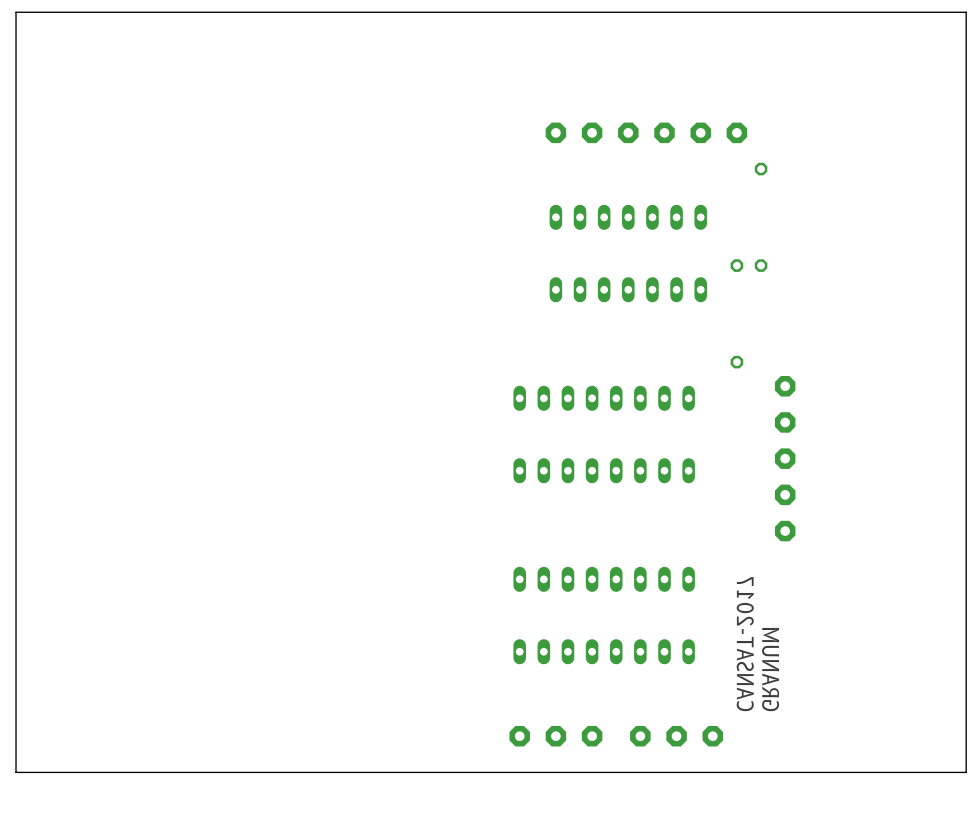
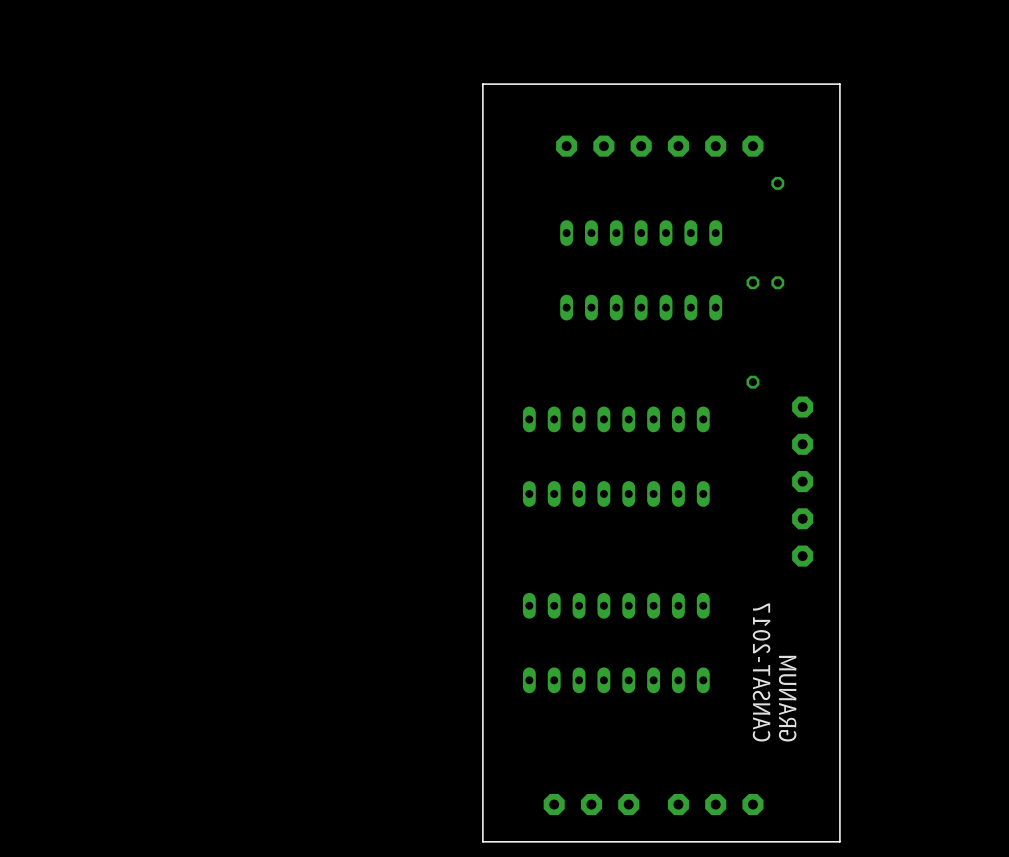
board edge: (966, 12) (16, 12) (16, 772) (966, 772) (966, 12) -> none
board edge: none -> (839, 84) (482, 84) (482, 841) (839, 841) (839, 84)
part: (519, 736) -> none
part: (555, 736) -> none
part: (592, 736) -> none
part: (640, 736) -> none
part: (676, 736) -> none
part: (712, 736) -> none
part: none -> (554, 804)
part: none -> (591, 804)
part: none -> (628, 804)
part: none -> (678, 804)
part: none -> (715, 804)
part: none -> (752, 804)

